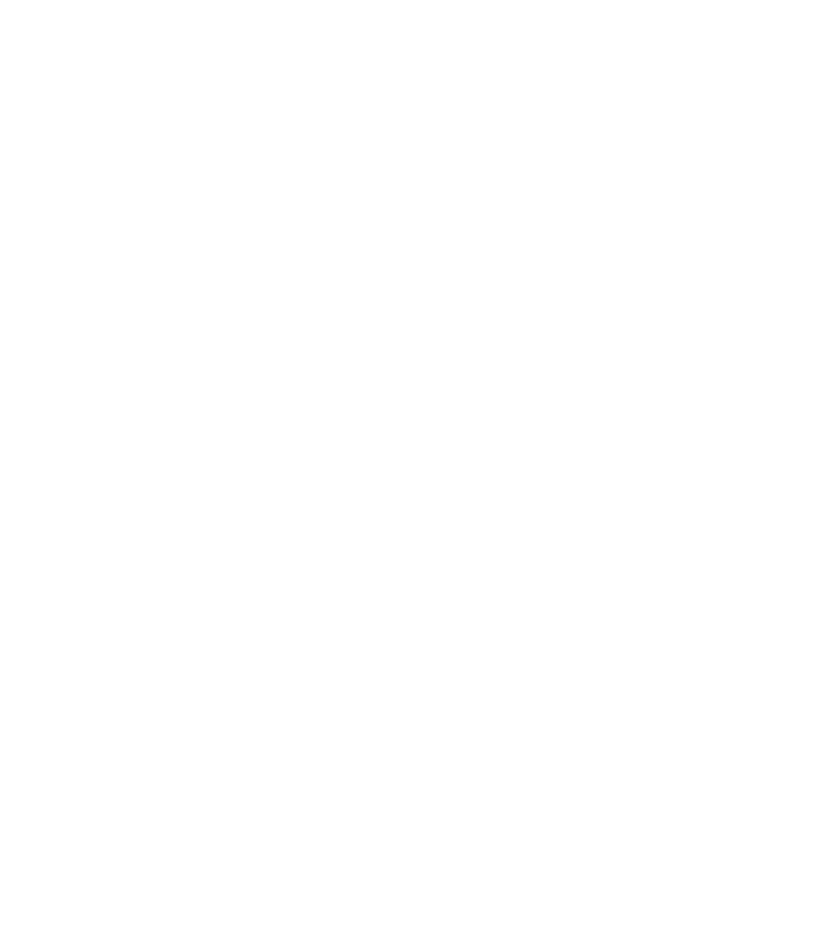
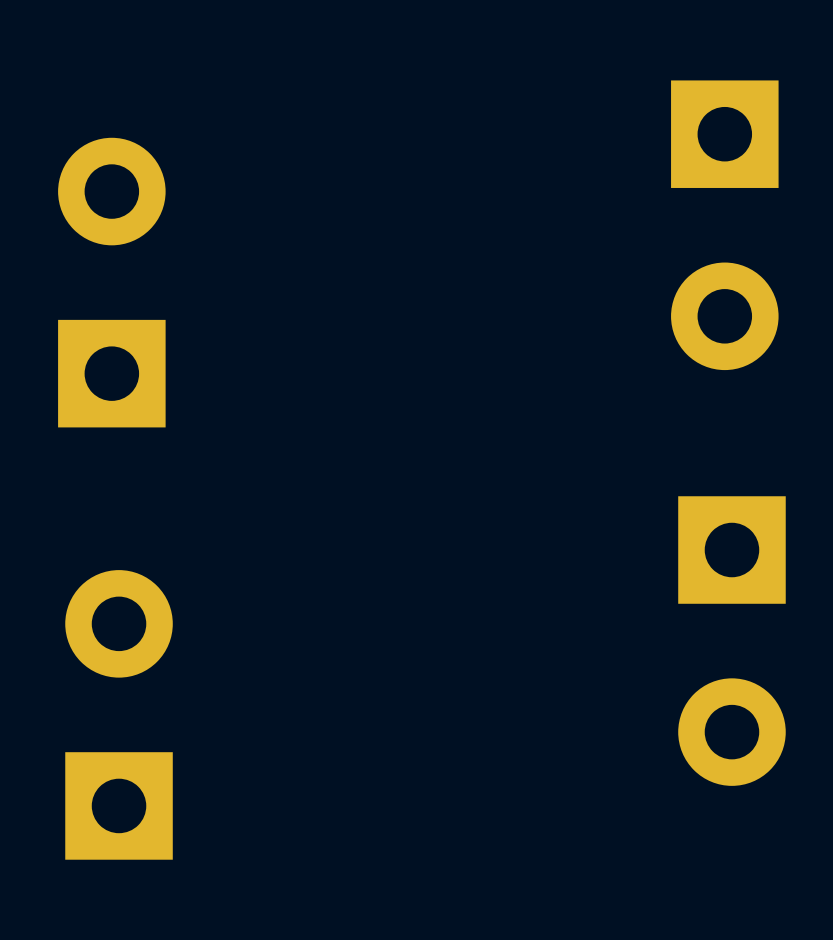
part: none -> (724, 225)
part: none -> (111, 282)
part: none -> (731, 641)
part: none -> (119, 714)

